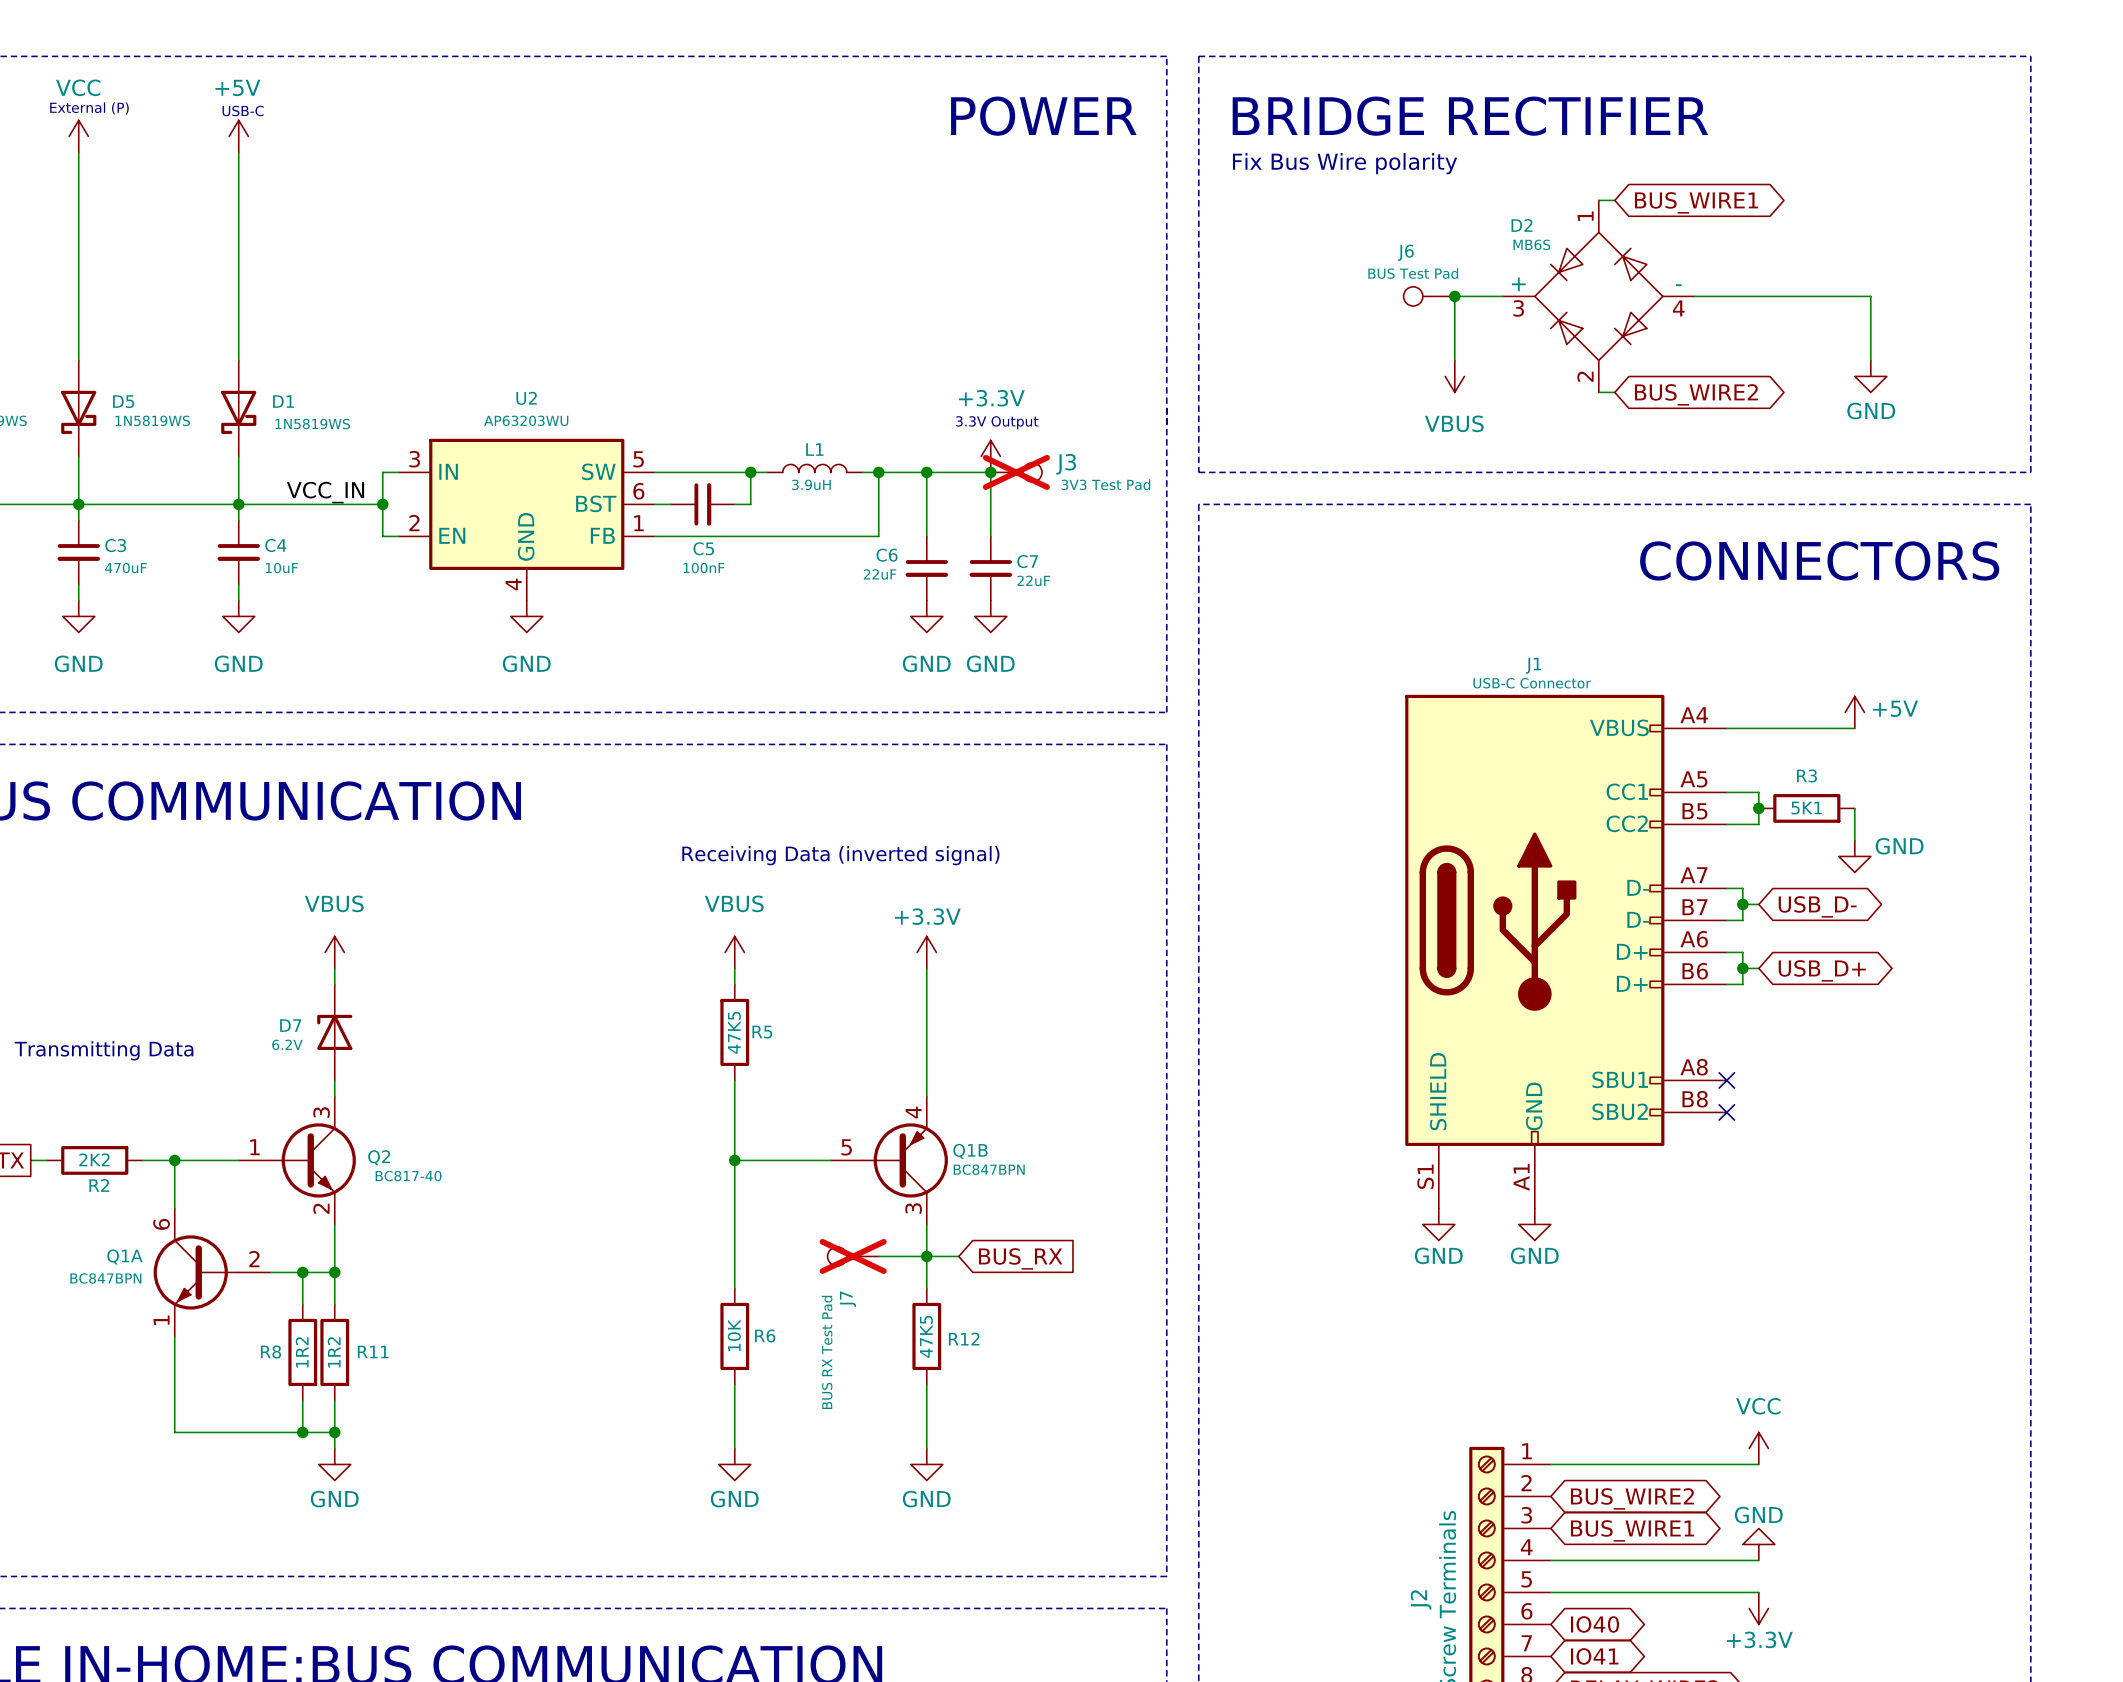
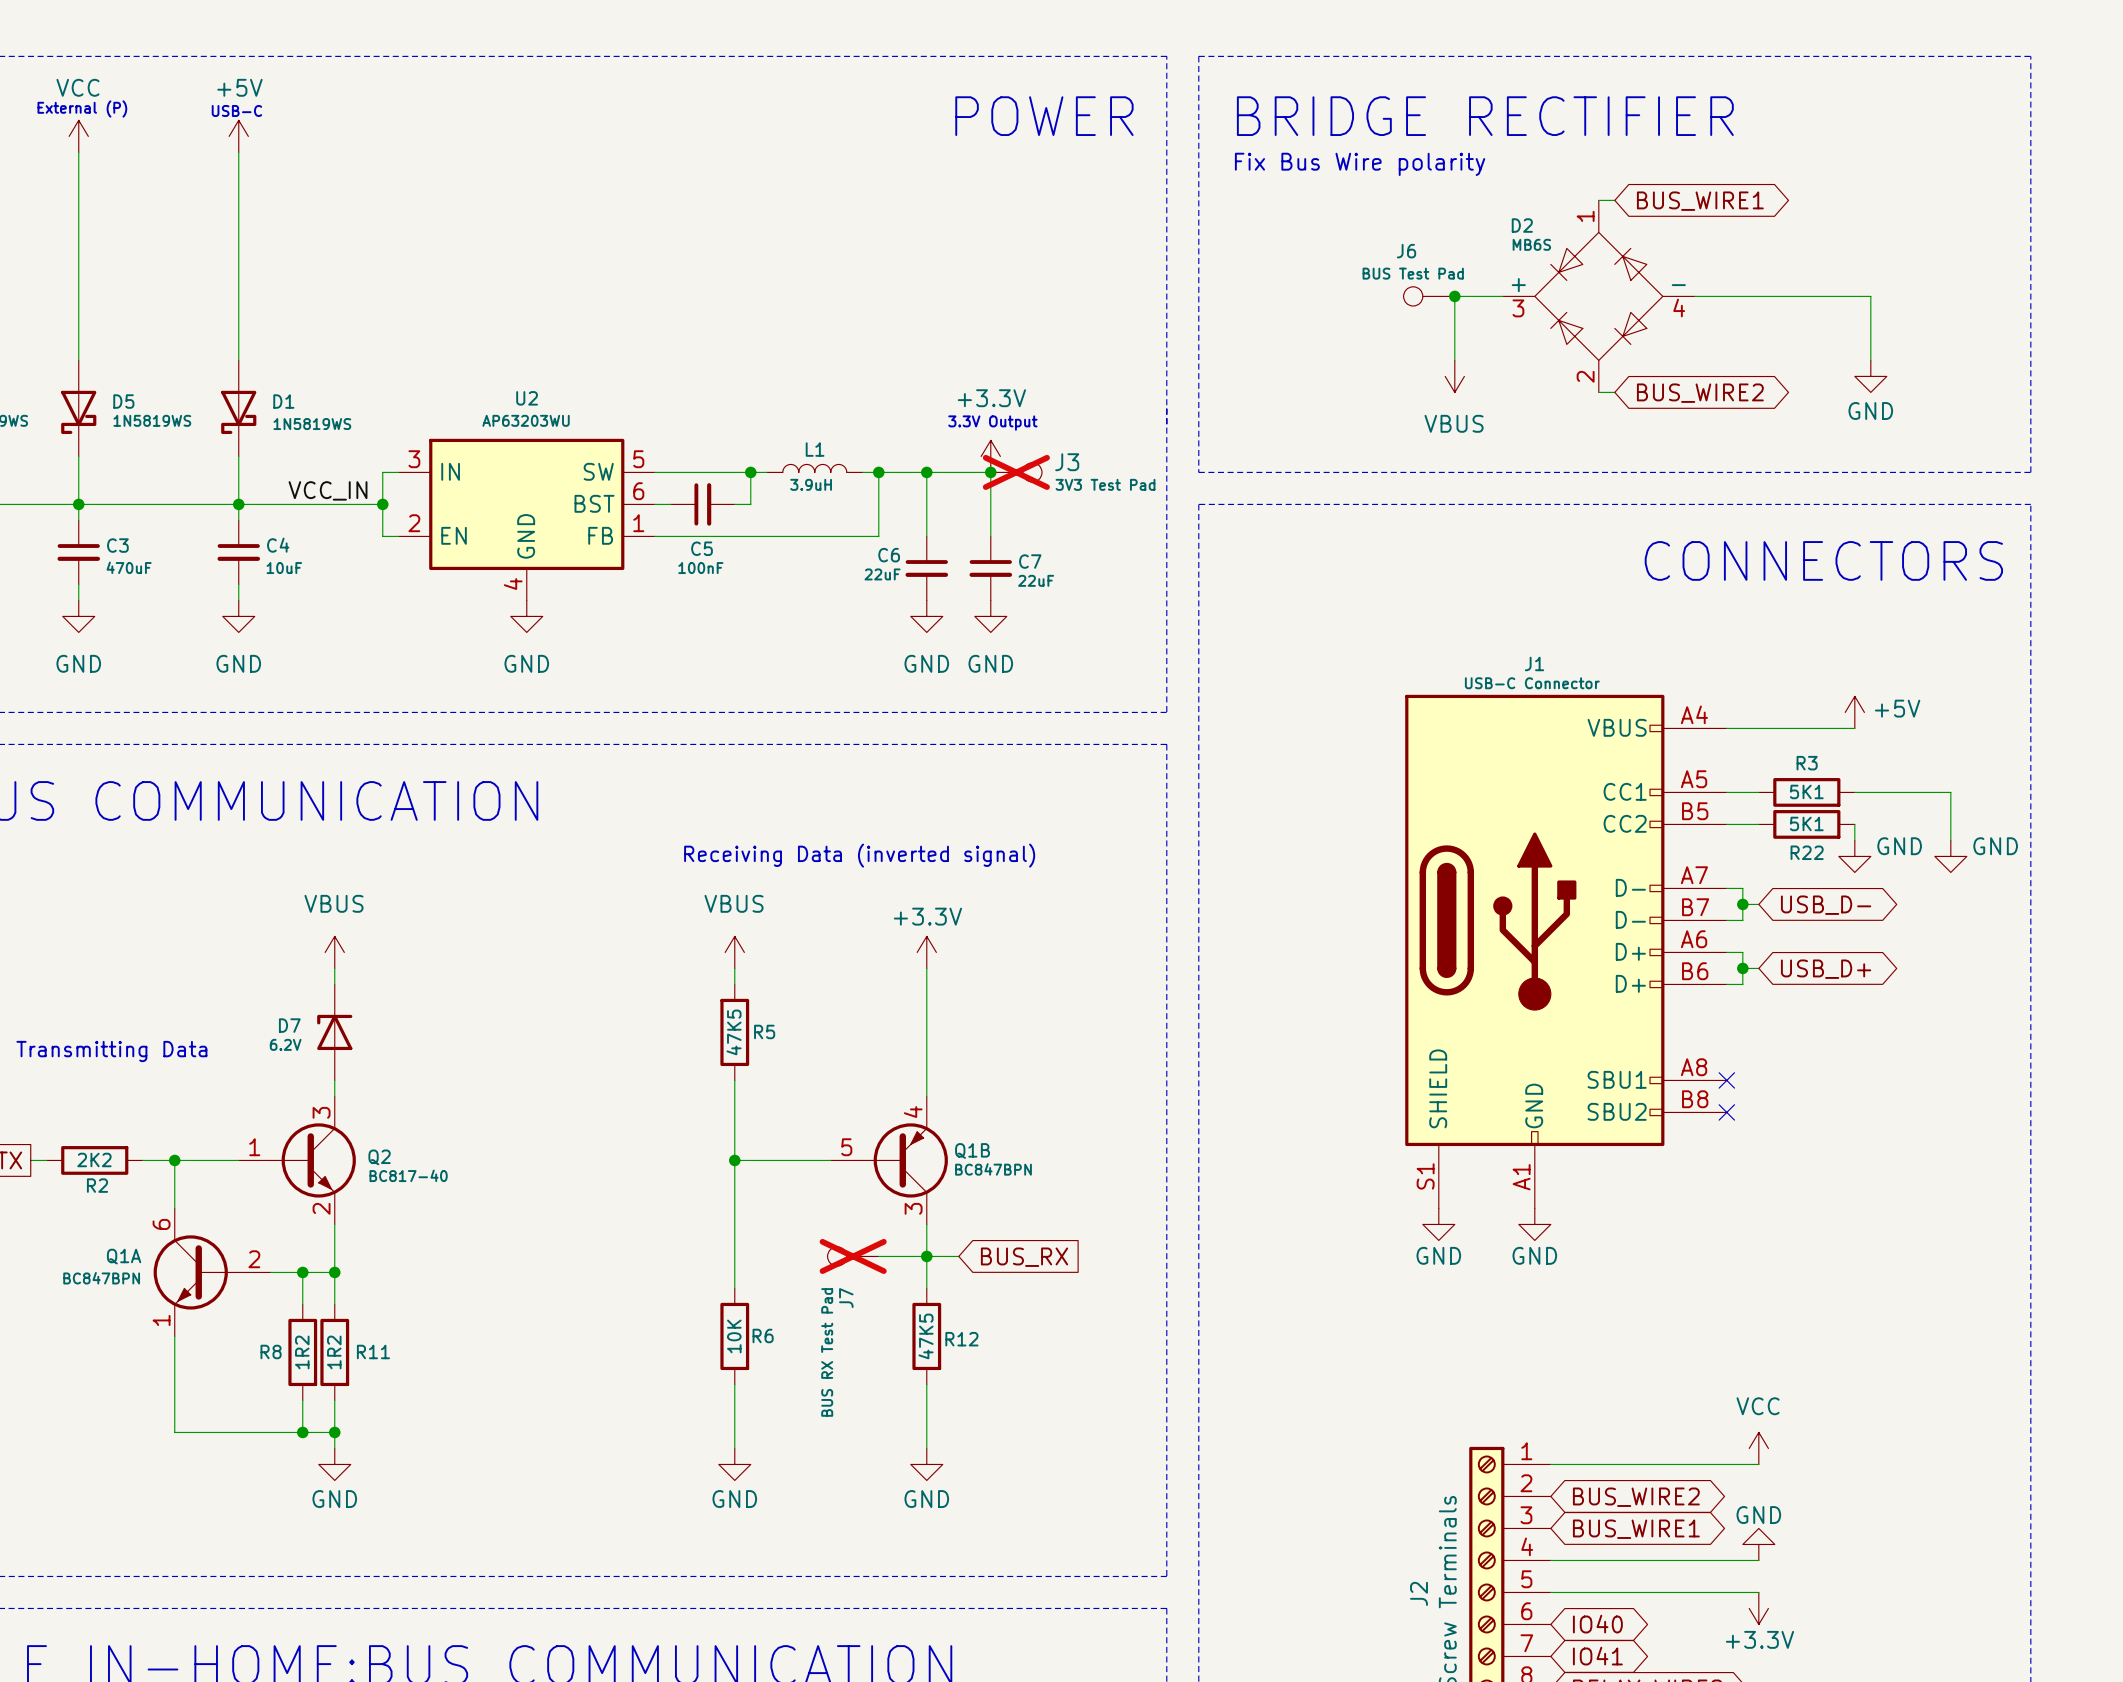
R3 name position: R3 (1806, 775) -> R3 (1807, 763)
wire: (1758, 792) (1758, 824) -> none
R22: none -> 5K1 (1806, 792)
wire: none -> (1854, 792) (1950, 792) (1950, 840)
junction: (1758, 808) -> none
R3 position: (1806, 808) -> (1806, 824)
wire: (1854, 808) (1854, 824) -> none
power symbol: none -> GND (1950, 856)

